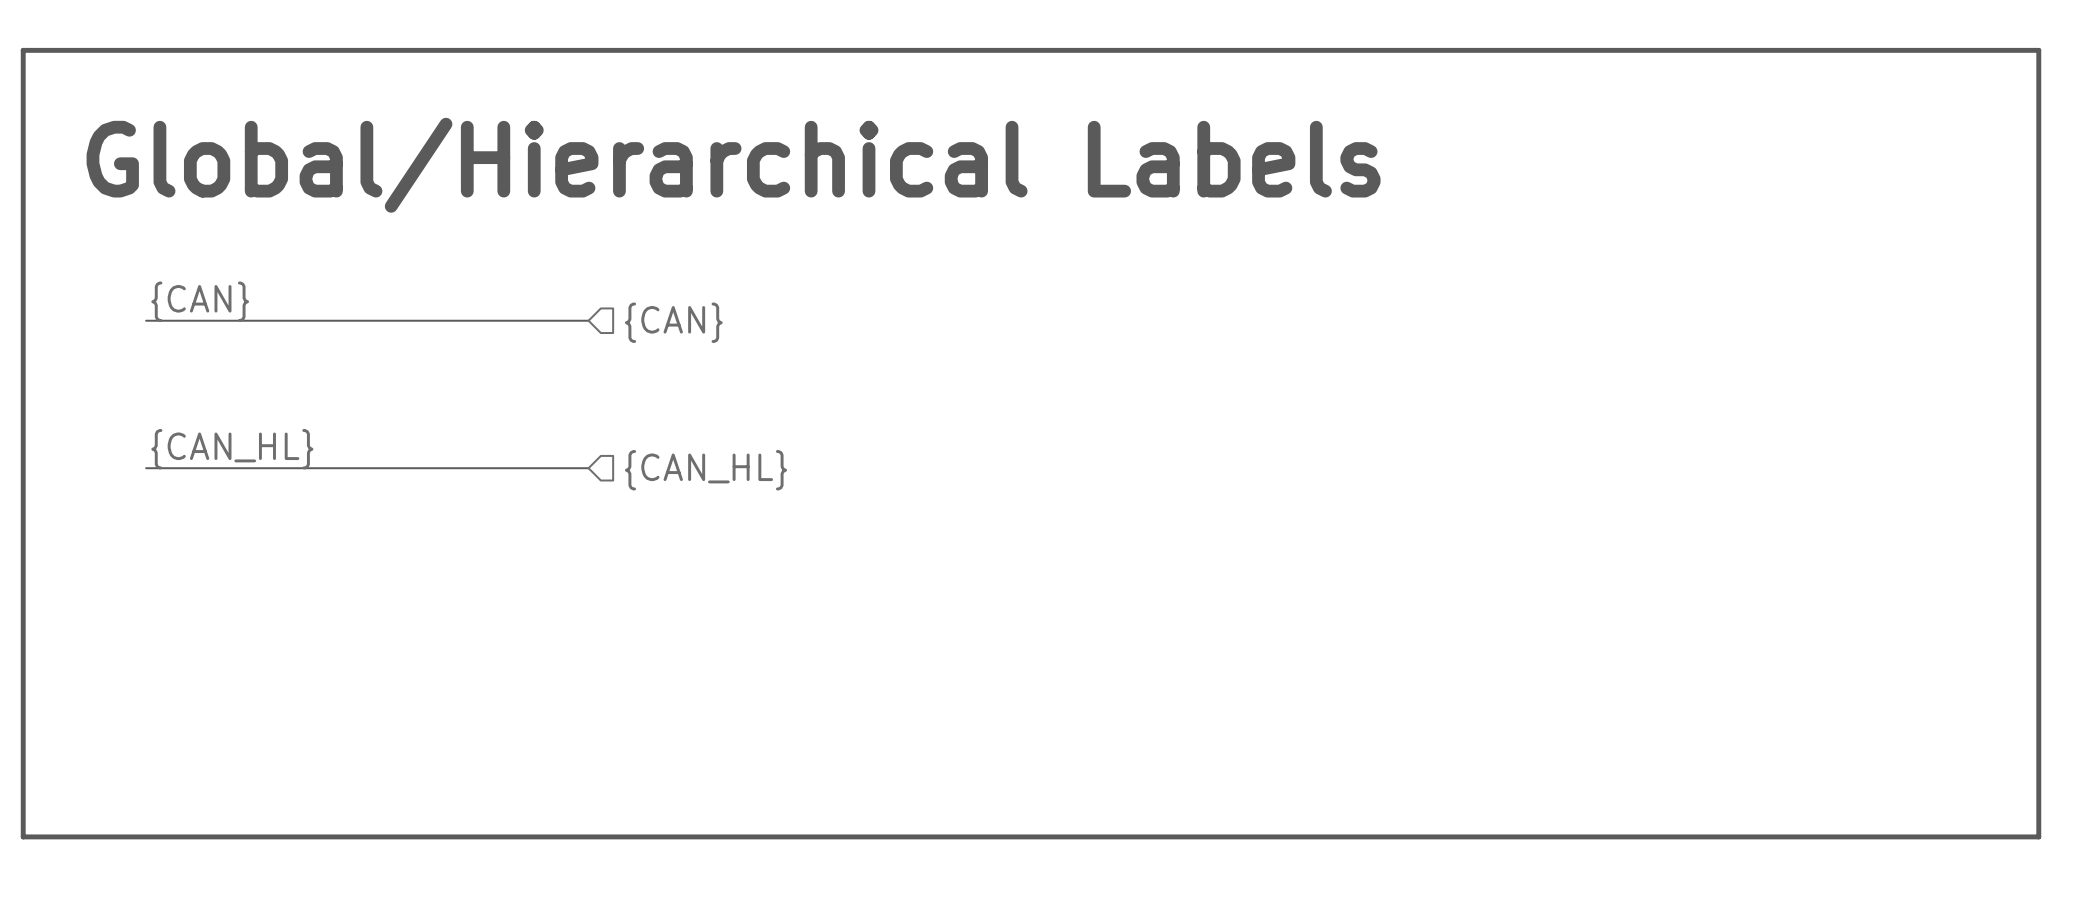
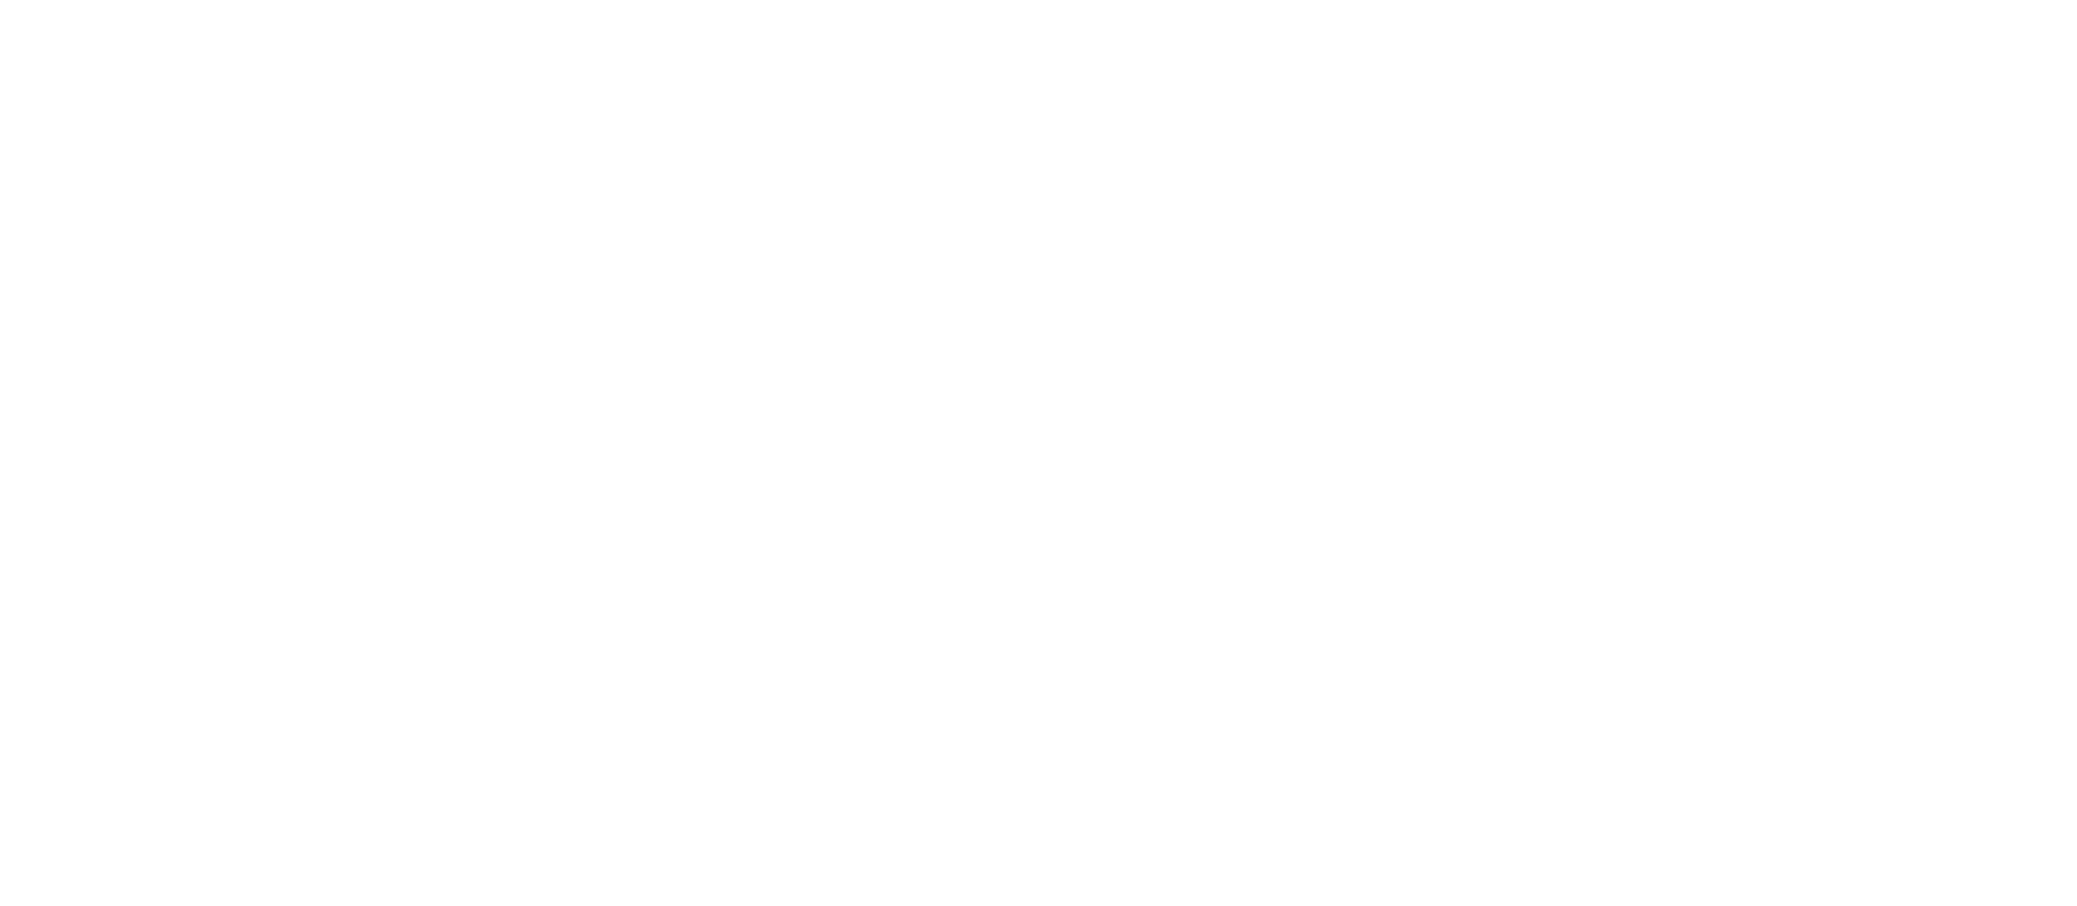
line: (23, 50) (2038, 50) (2038, 836) (23, 836) (23, 50) -> none
text: Global/Hierarchical Labels (733, 165) -> none
label: {CAN} (200, 301) -> none
bus: (146, 320) (588, 320) -> none
hierarchical label: {CAN} (673, 322) -> none
label: {CAN_HL} (232, 449) -> none
bus: (146, 468) (588, 468) -> none
hierarchical label: {CAN_HL} (706, 470) -> none

